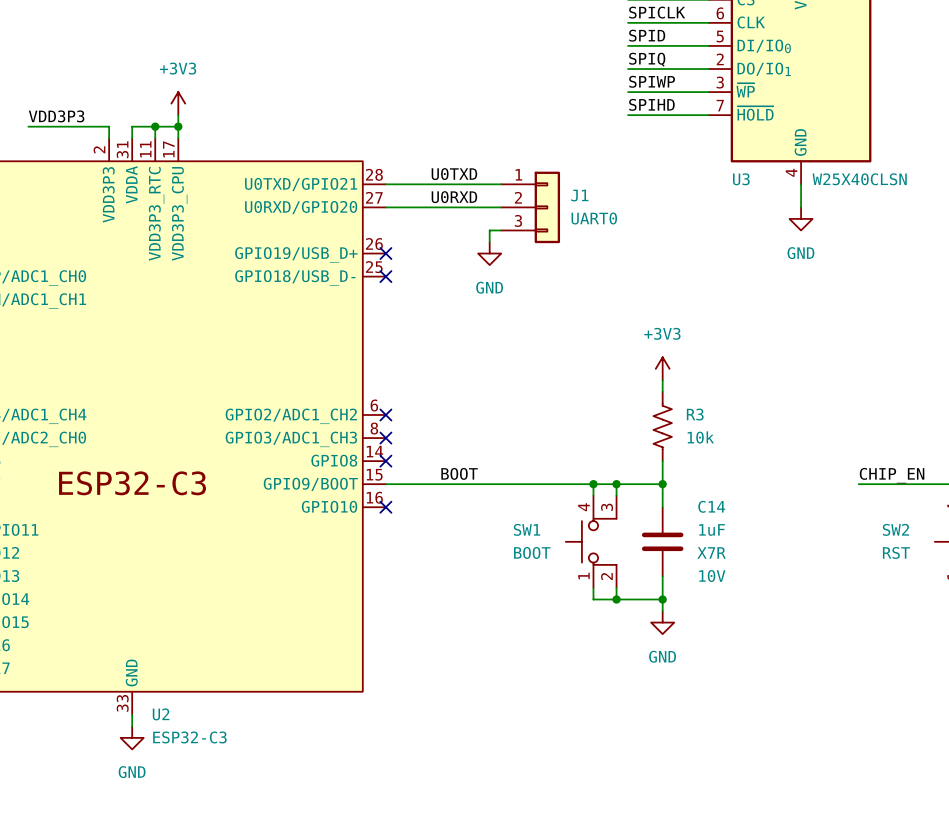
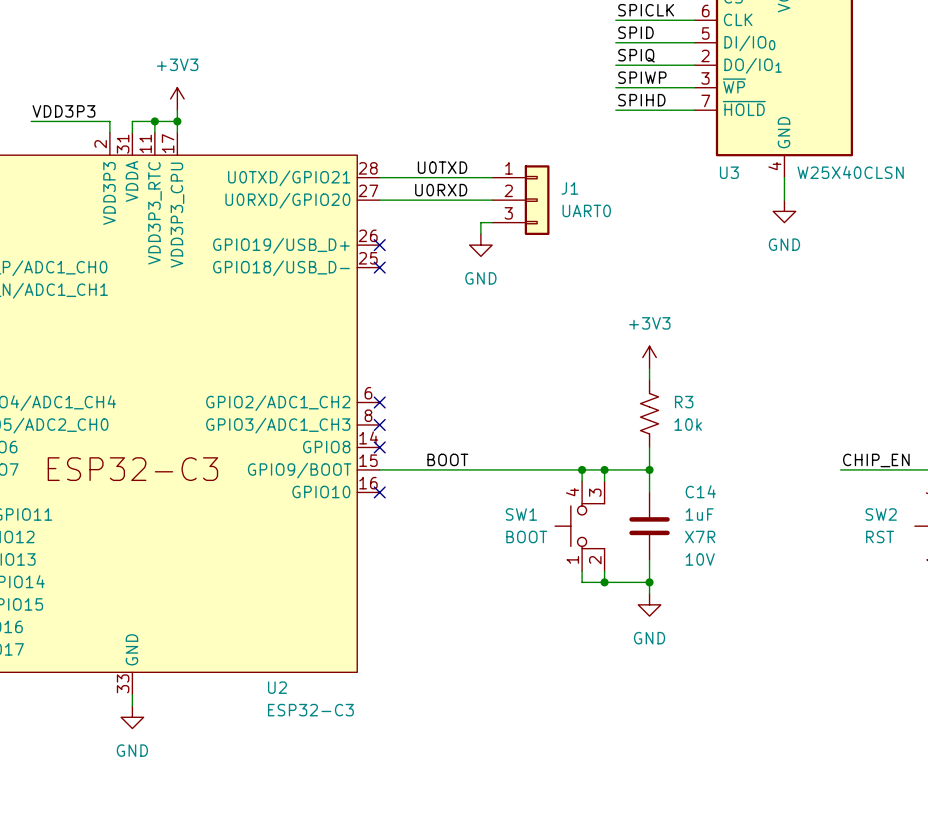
U2 name position: U2 (161, 714) -> U2 (277, 687)
U2 value position: ESP32-C3 (189, 737) -> ESP32-C3 (310, 710)

